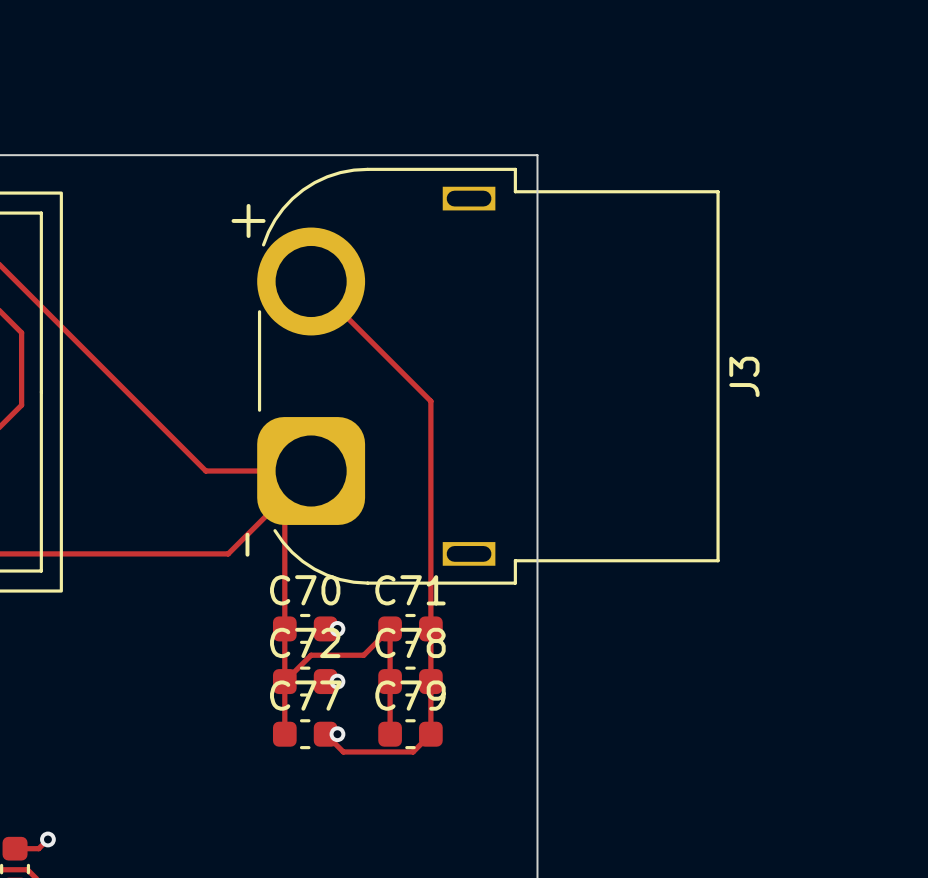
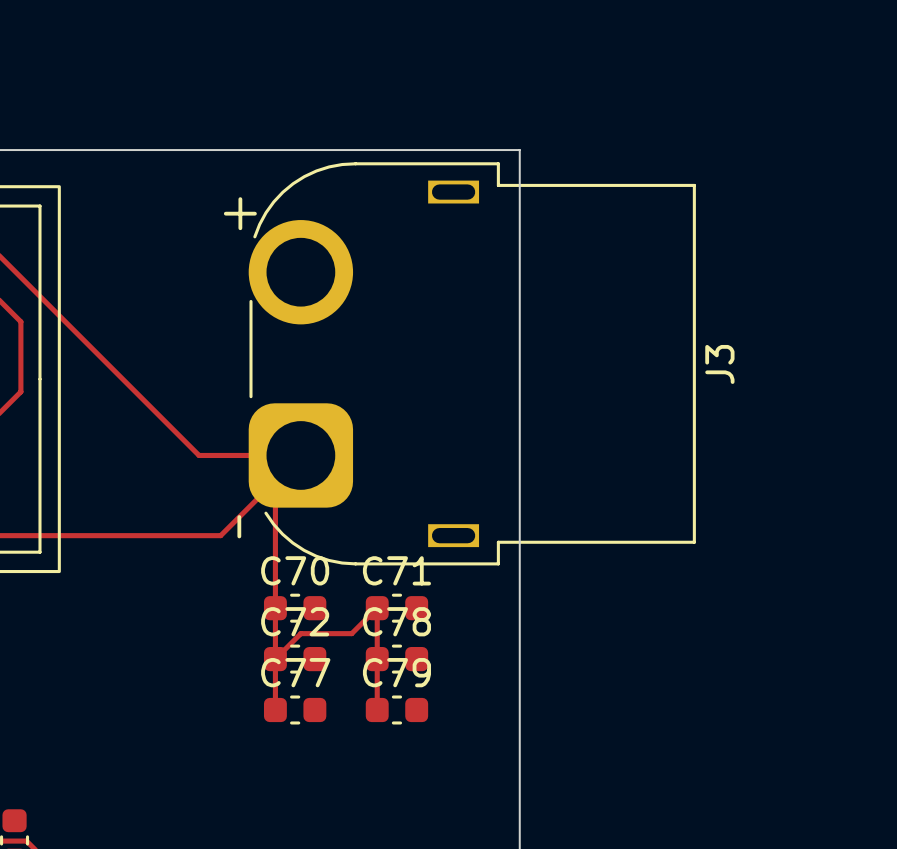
track: (311, 281) (430, 401) (430, 734) (413, 751) (343, 751) (325, 734) (337, 734) -> none
via: (337, 628) -> none
via: (337, 681) -> none
via: (337, 734) -> none
track: (47, 839) (38, 848) (15, 848) -> none
via: (47, 839) -> none

